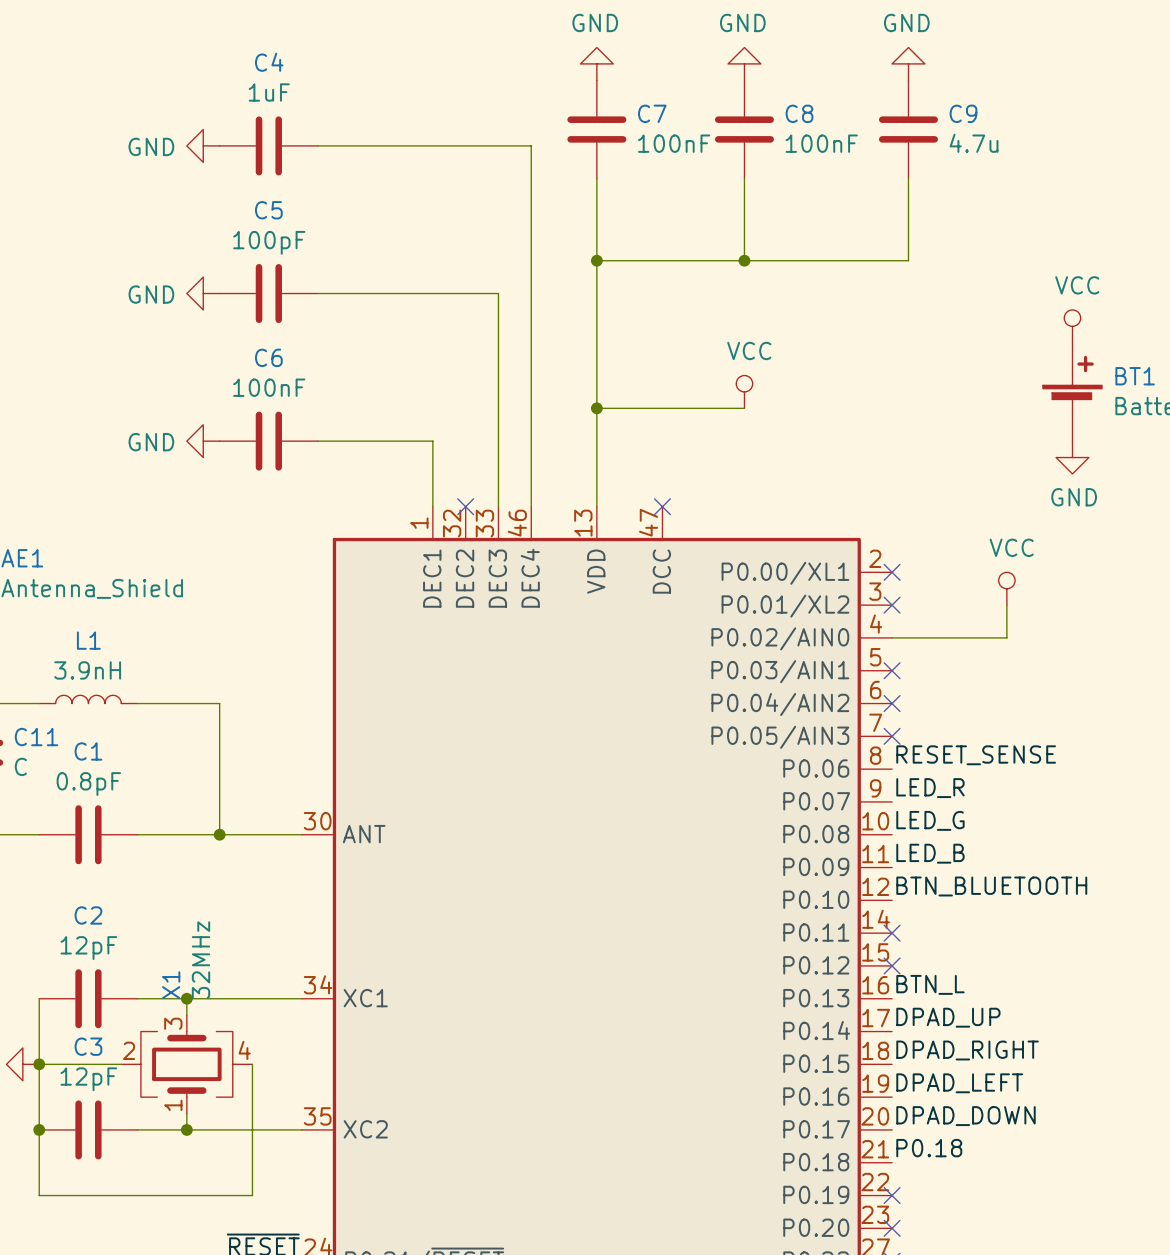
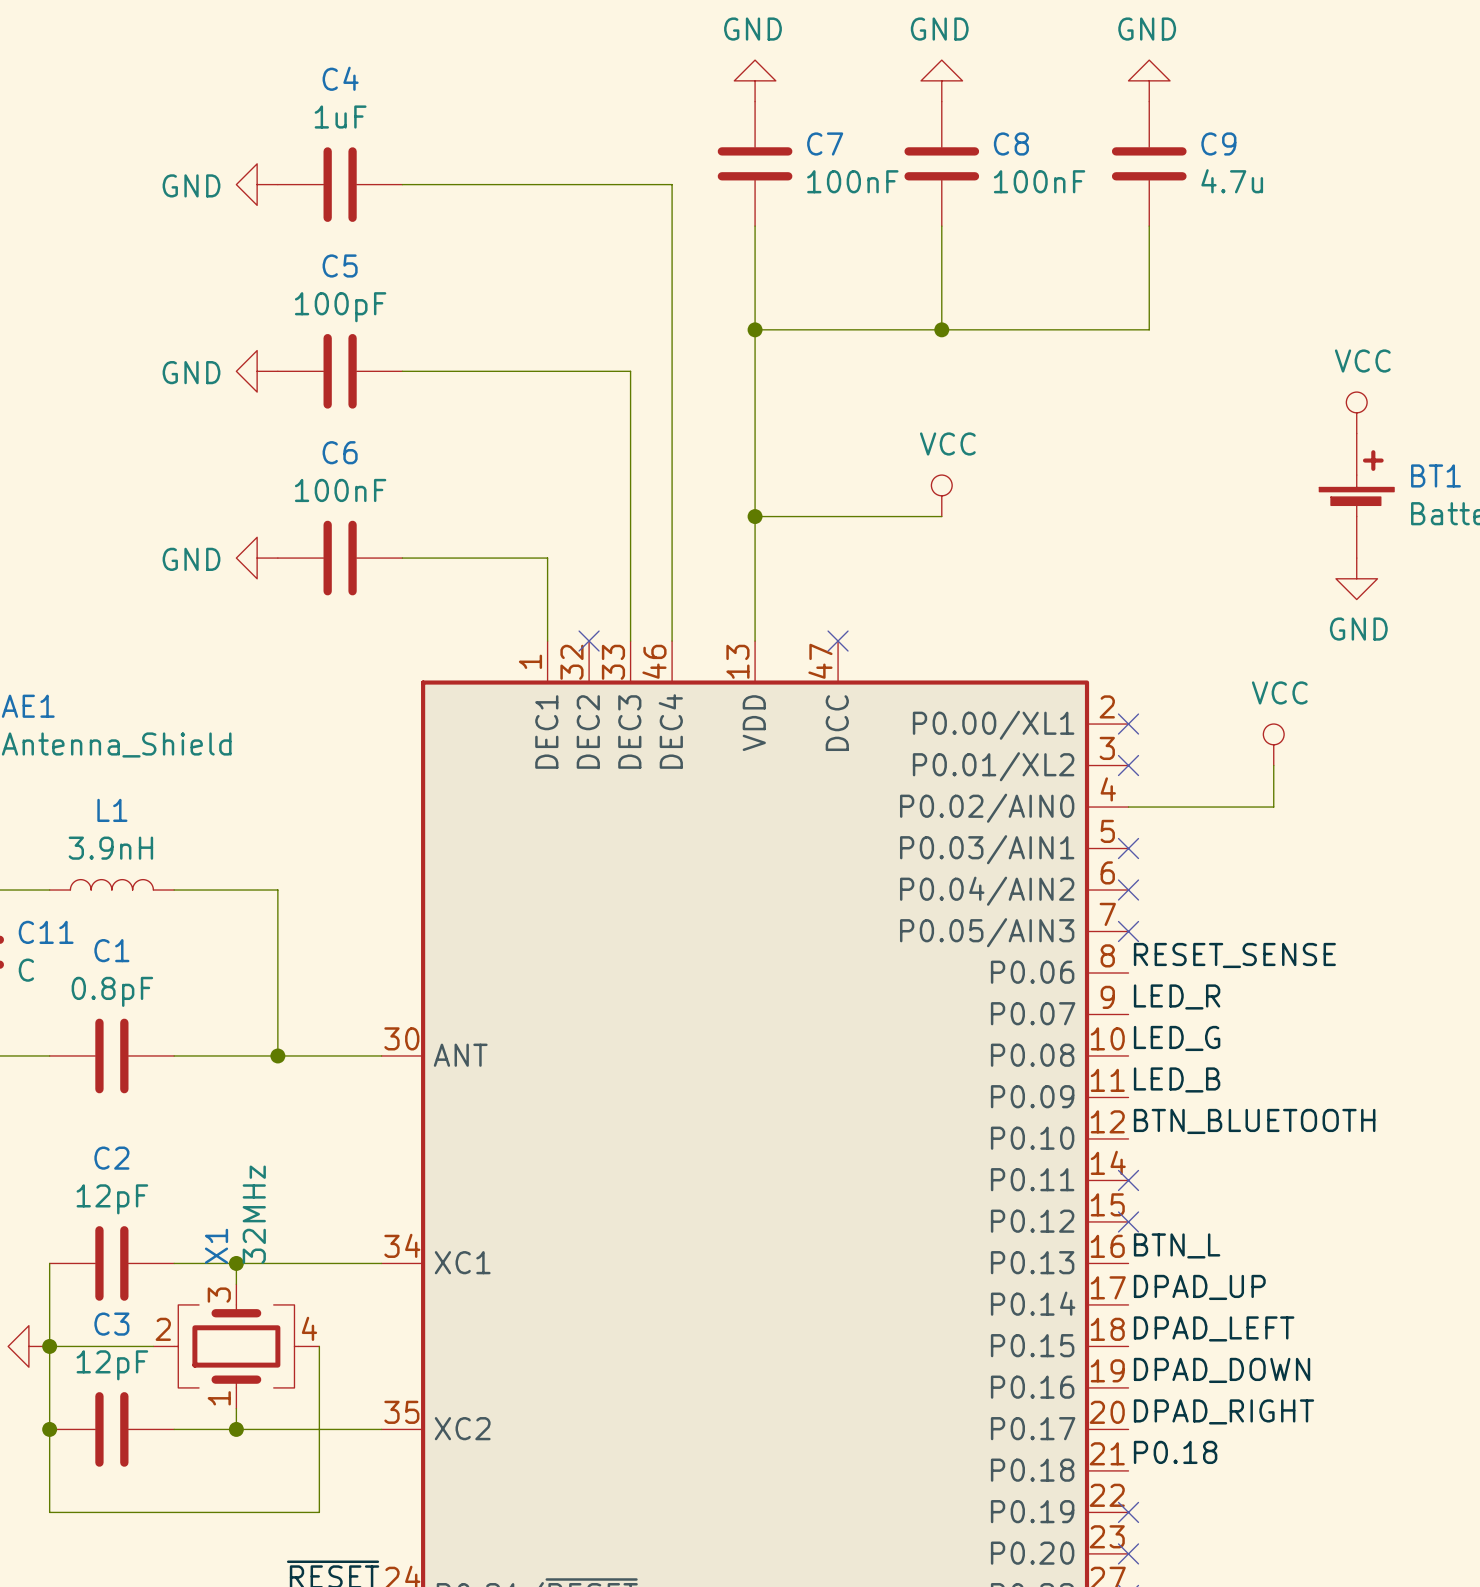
label: DPAD_RIGHT (967, 1050) -> DPAD_LEFT (1214, 1328)
label: DPAD_LEFT (959, 1083) -> DPAD_DOWN (1222, 1370)
label: DPAD_DOWN (966, 1116) -> DPAD_RIGHT (1224, 1411)

